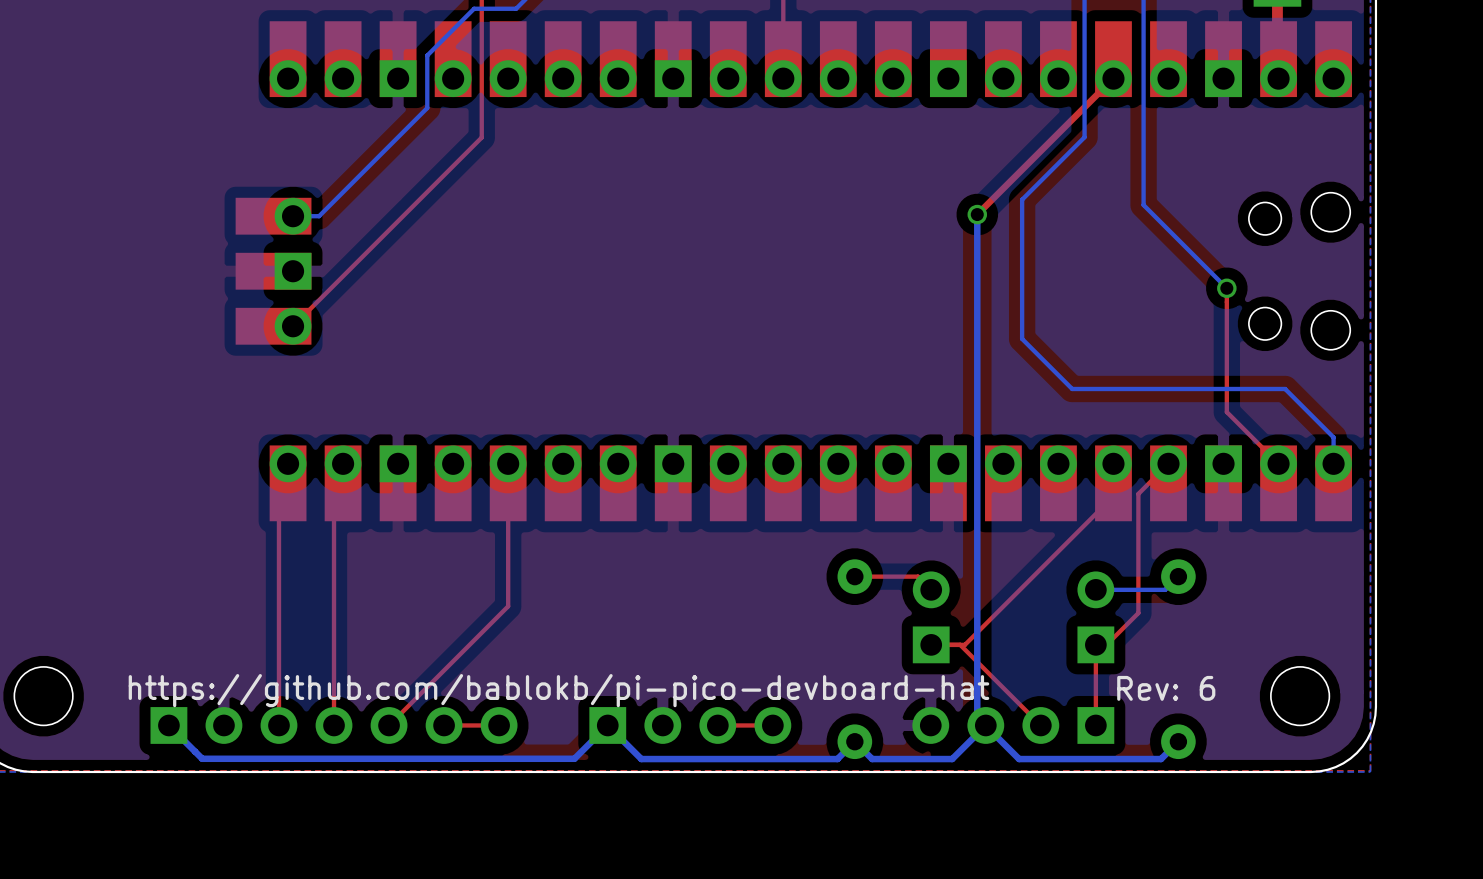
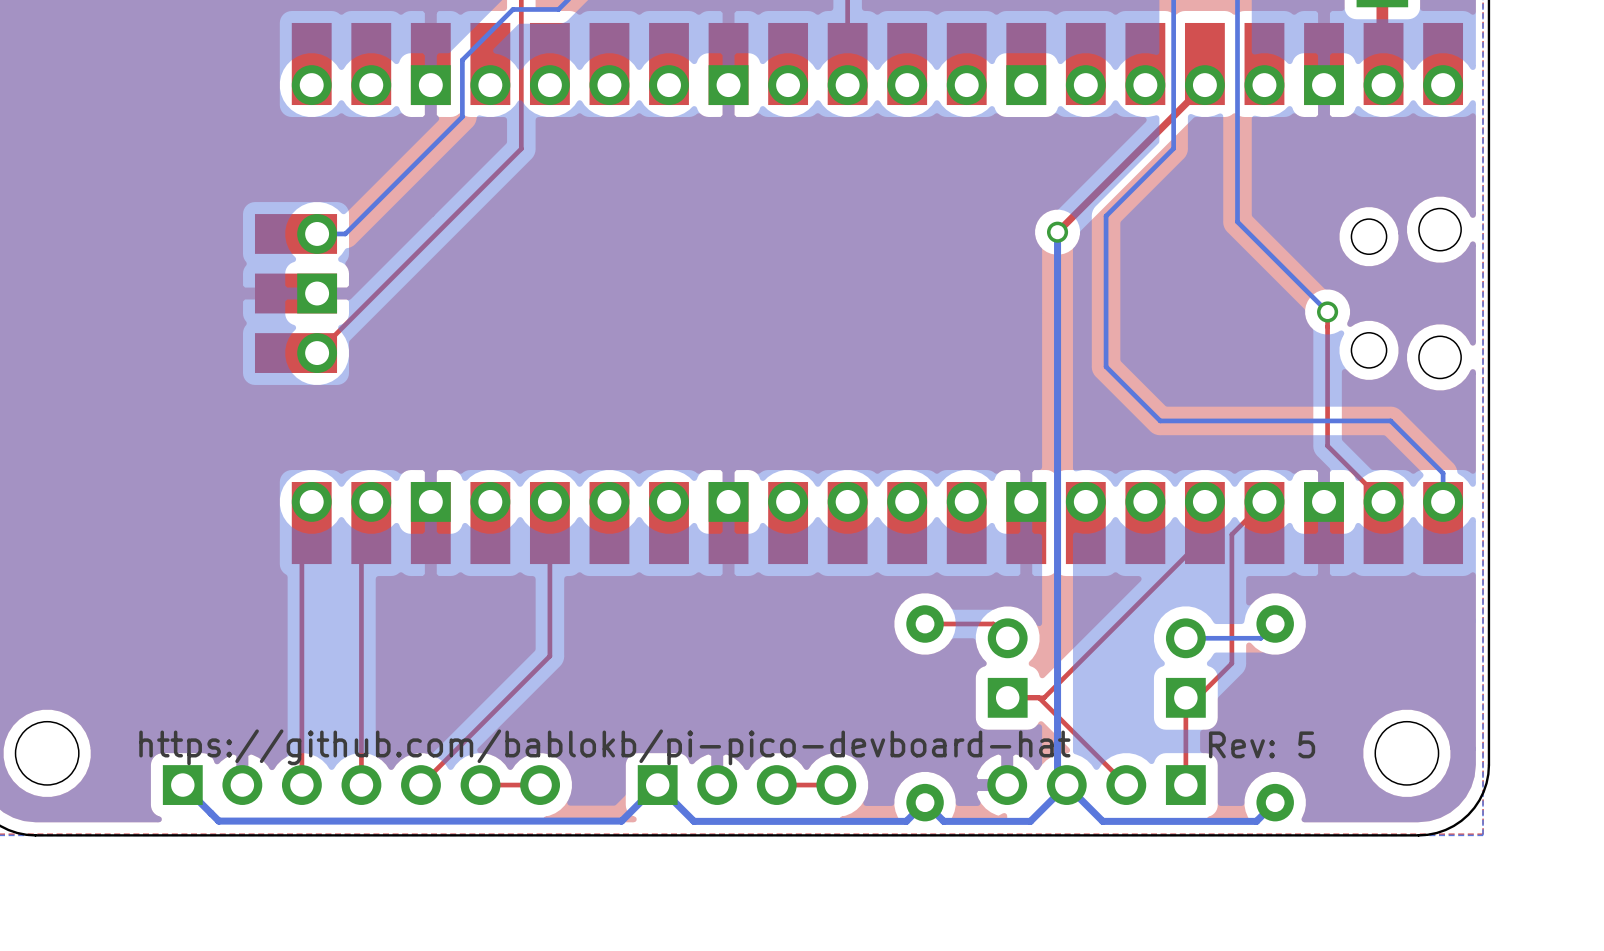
text: Rev: 6 (1166, 688) -> Rev: 5 (1262, 744)

